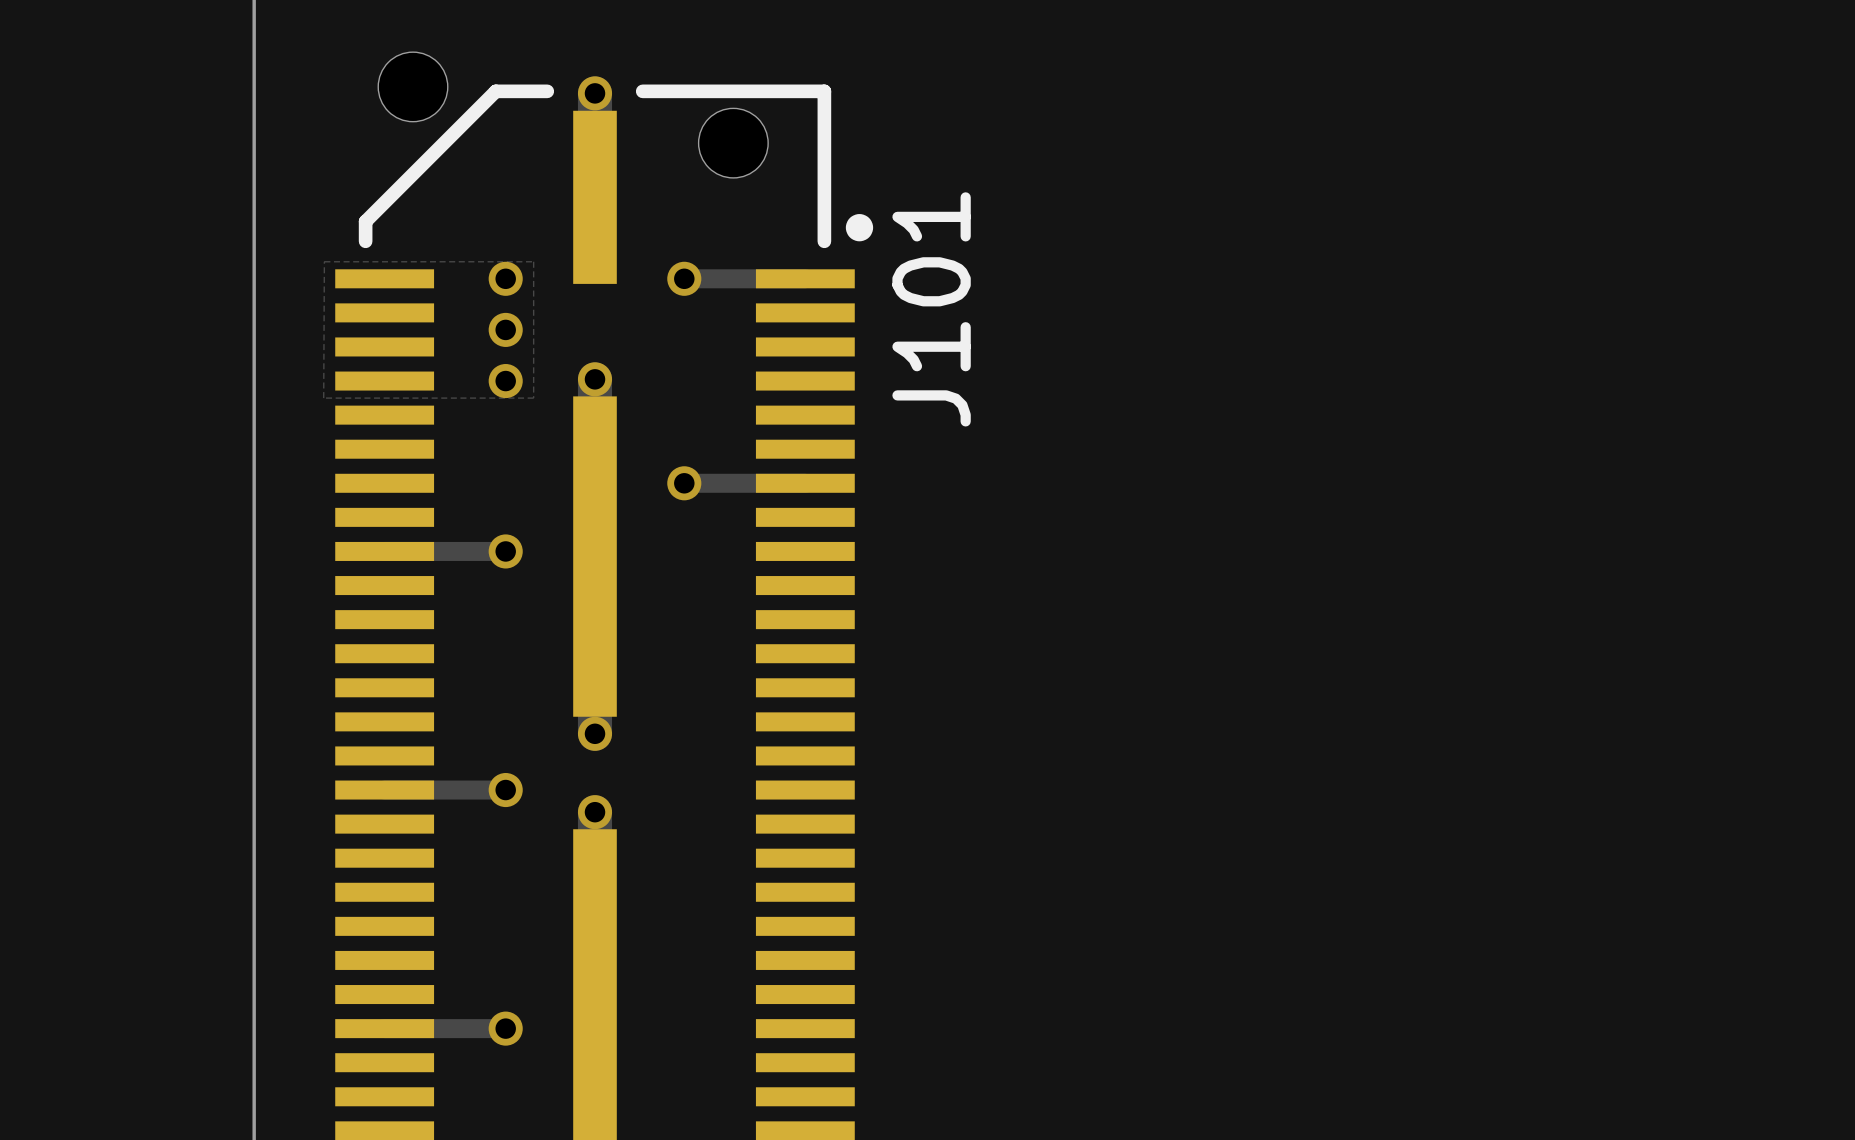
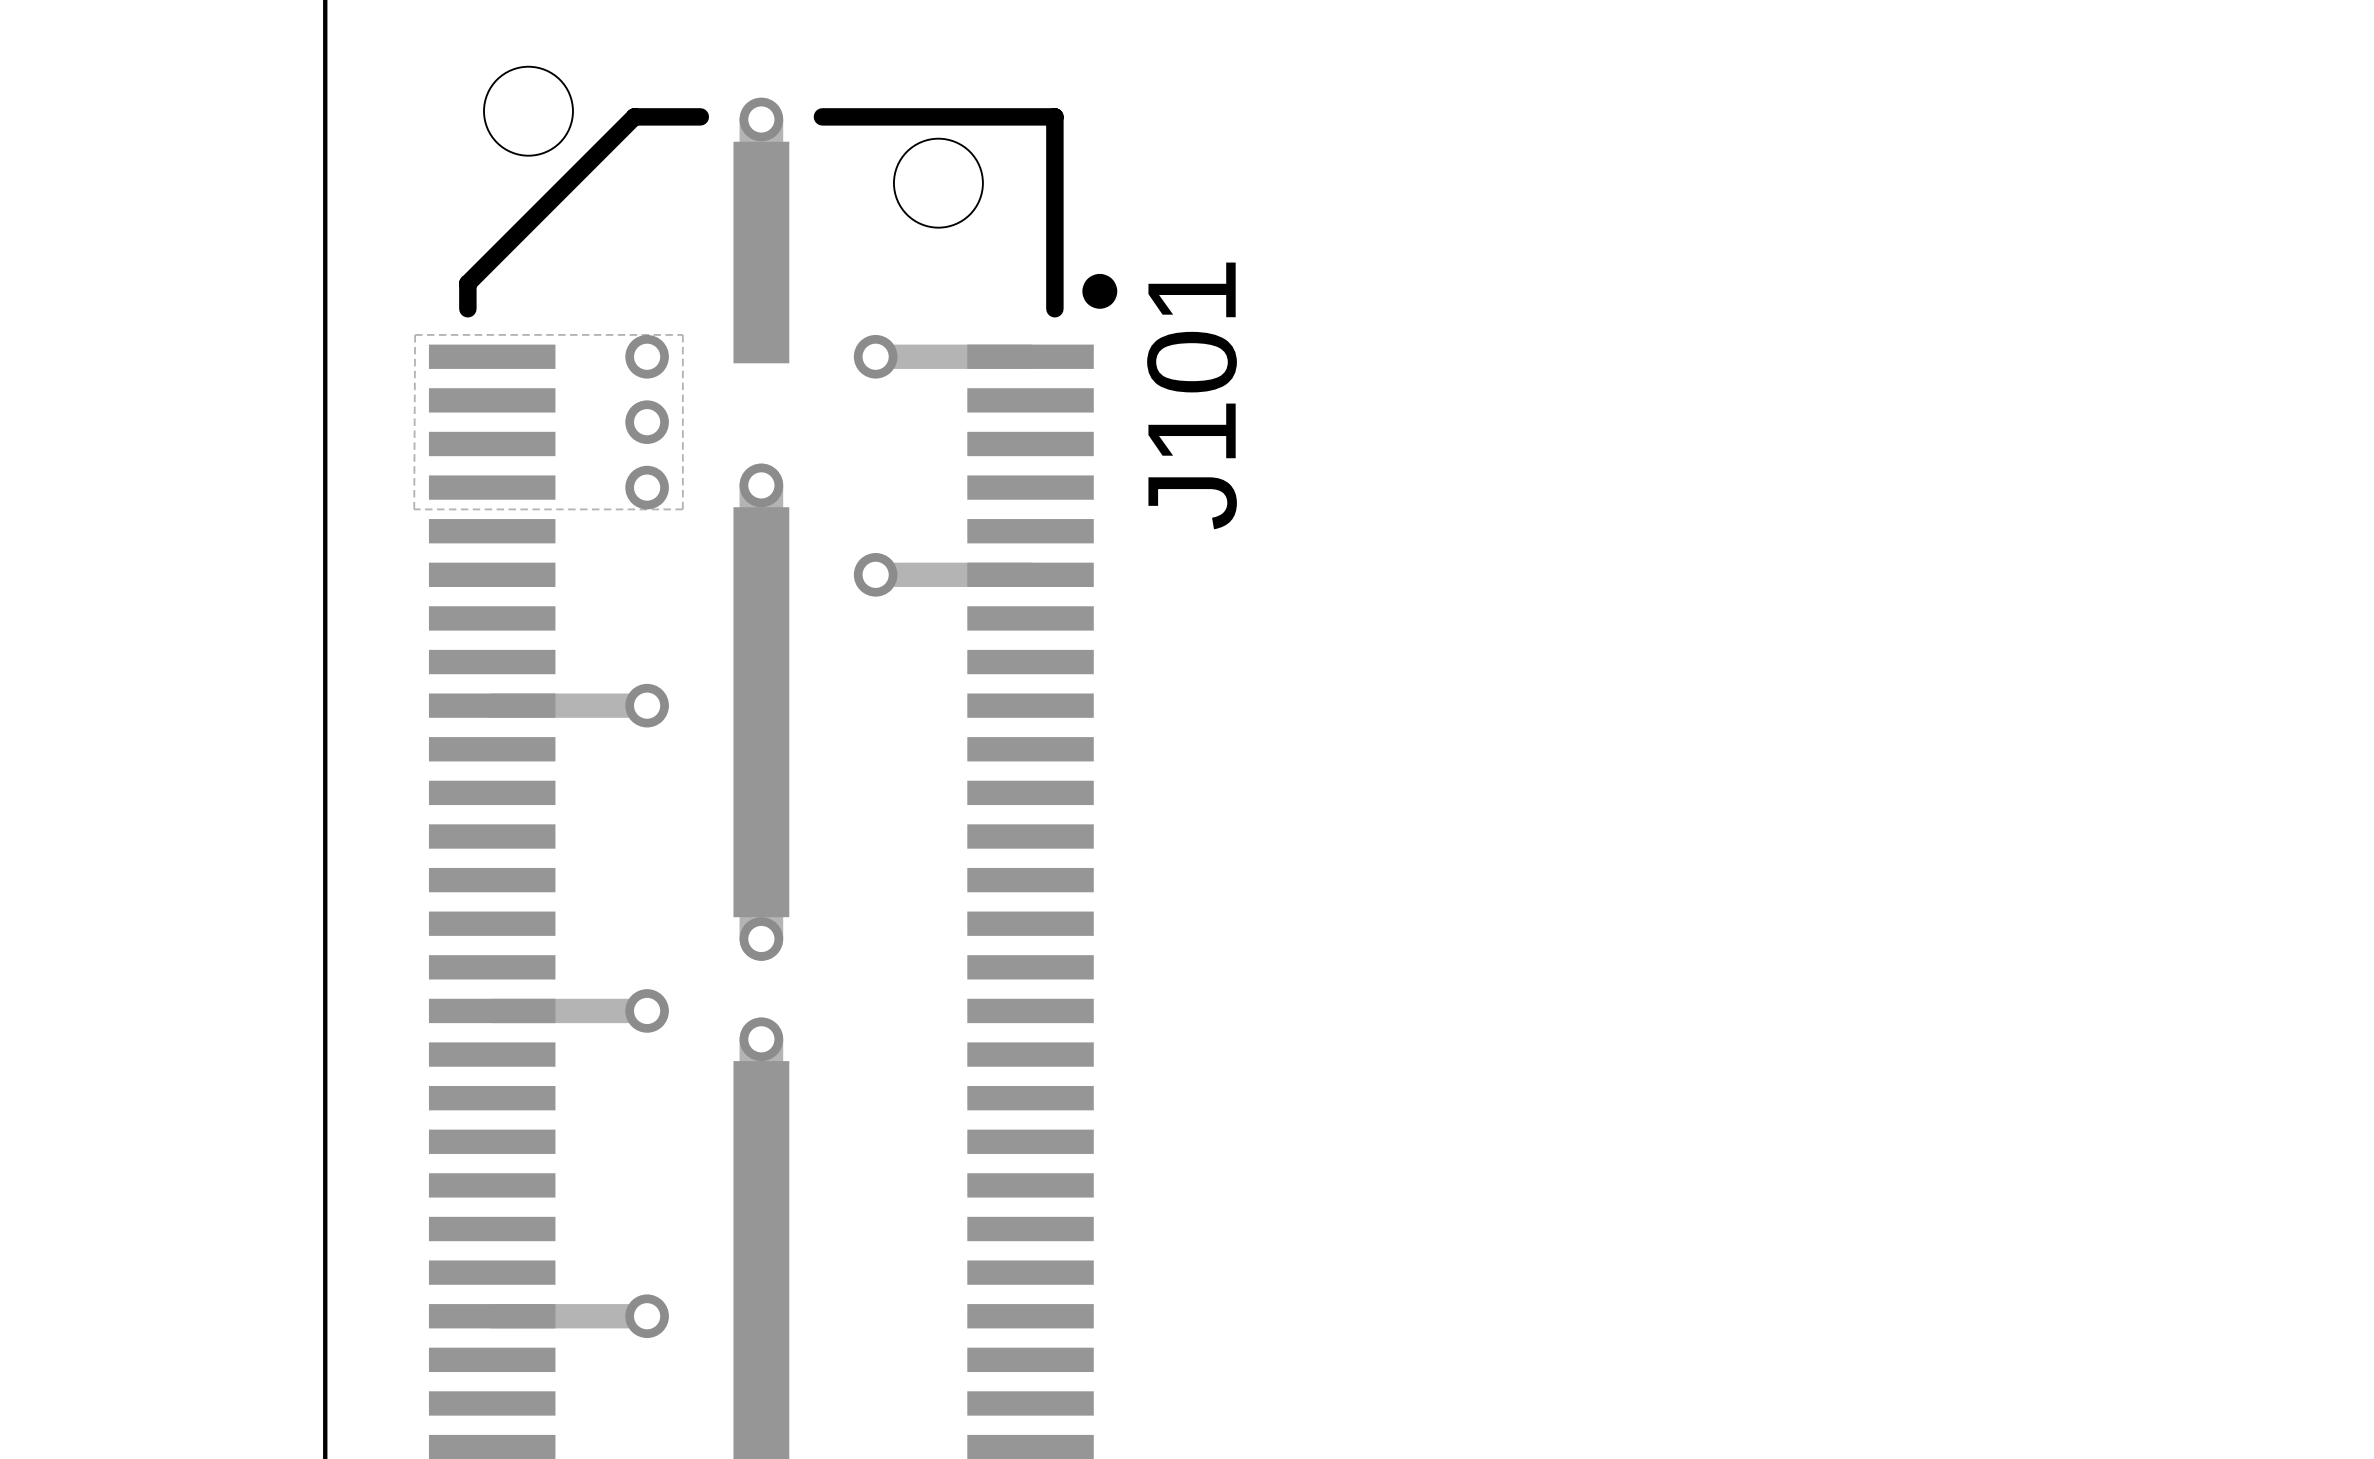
track: (684, 483) (805, 483) -> (875, 574) (1030, 574)
via position: (684, 483) -> (875, 574)

